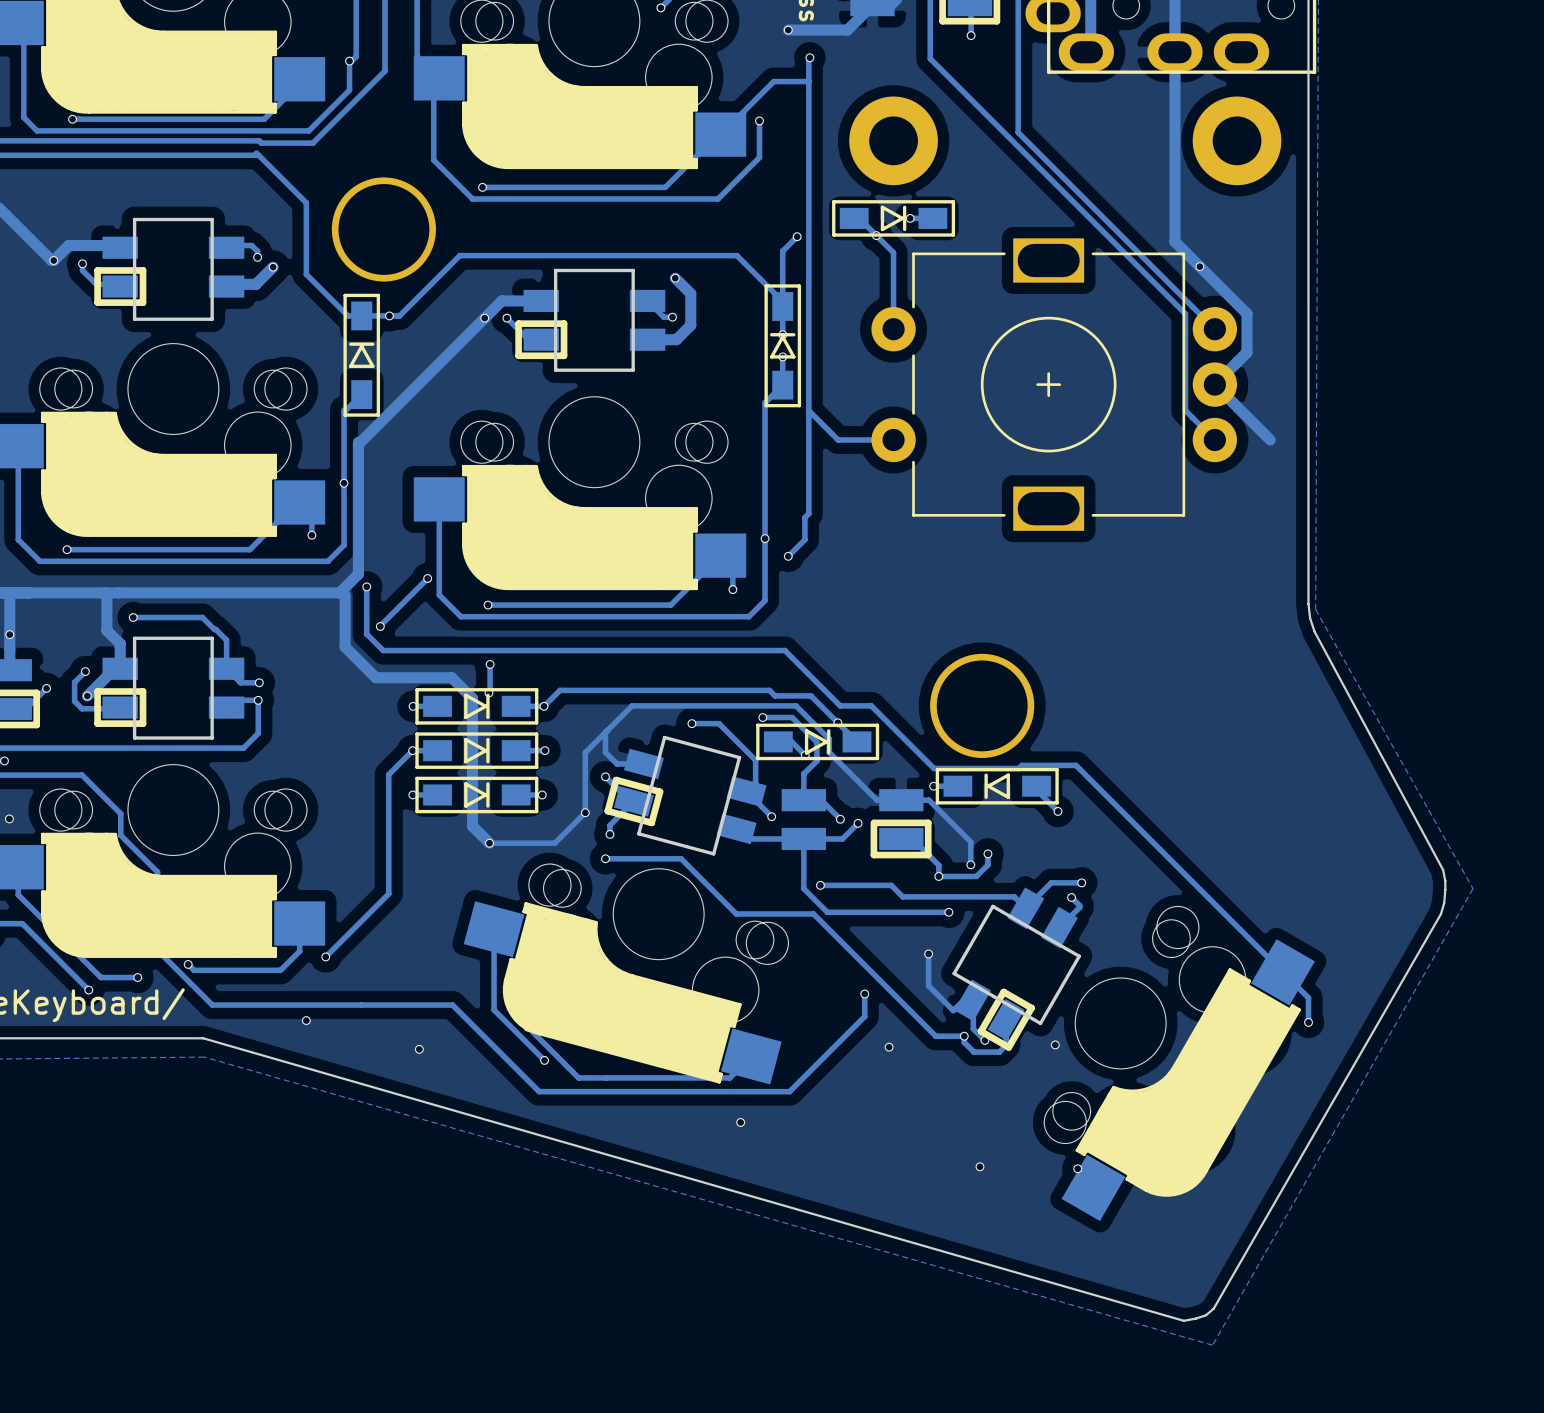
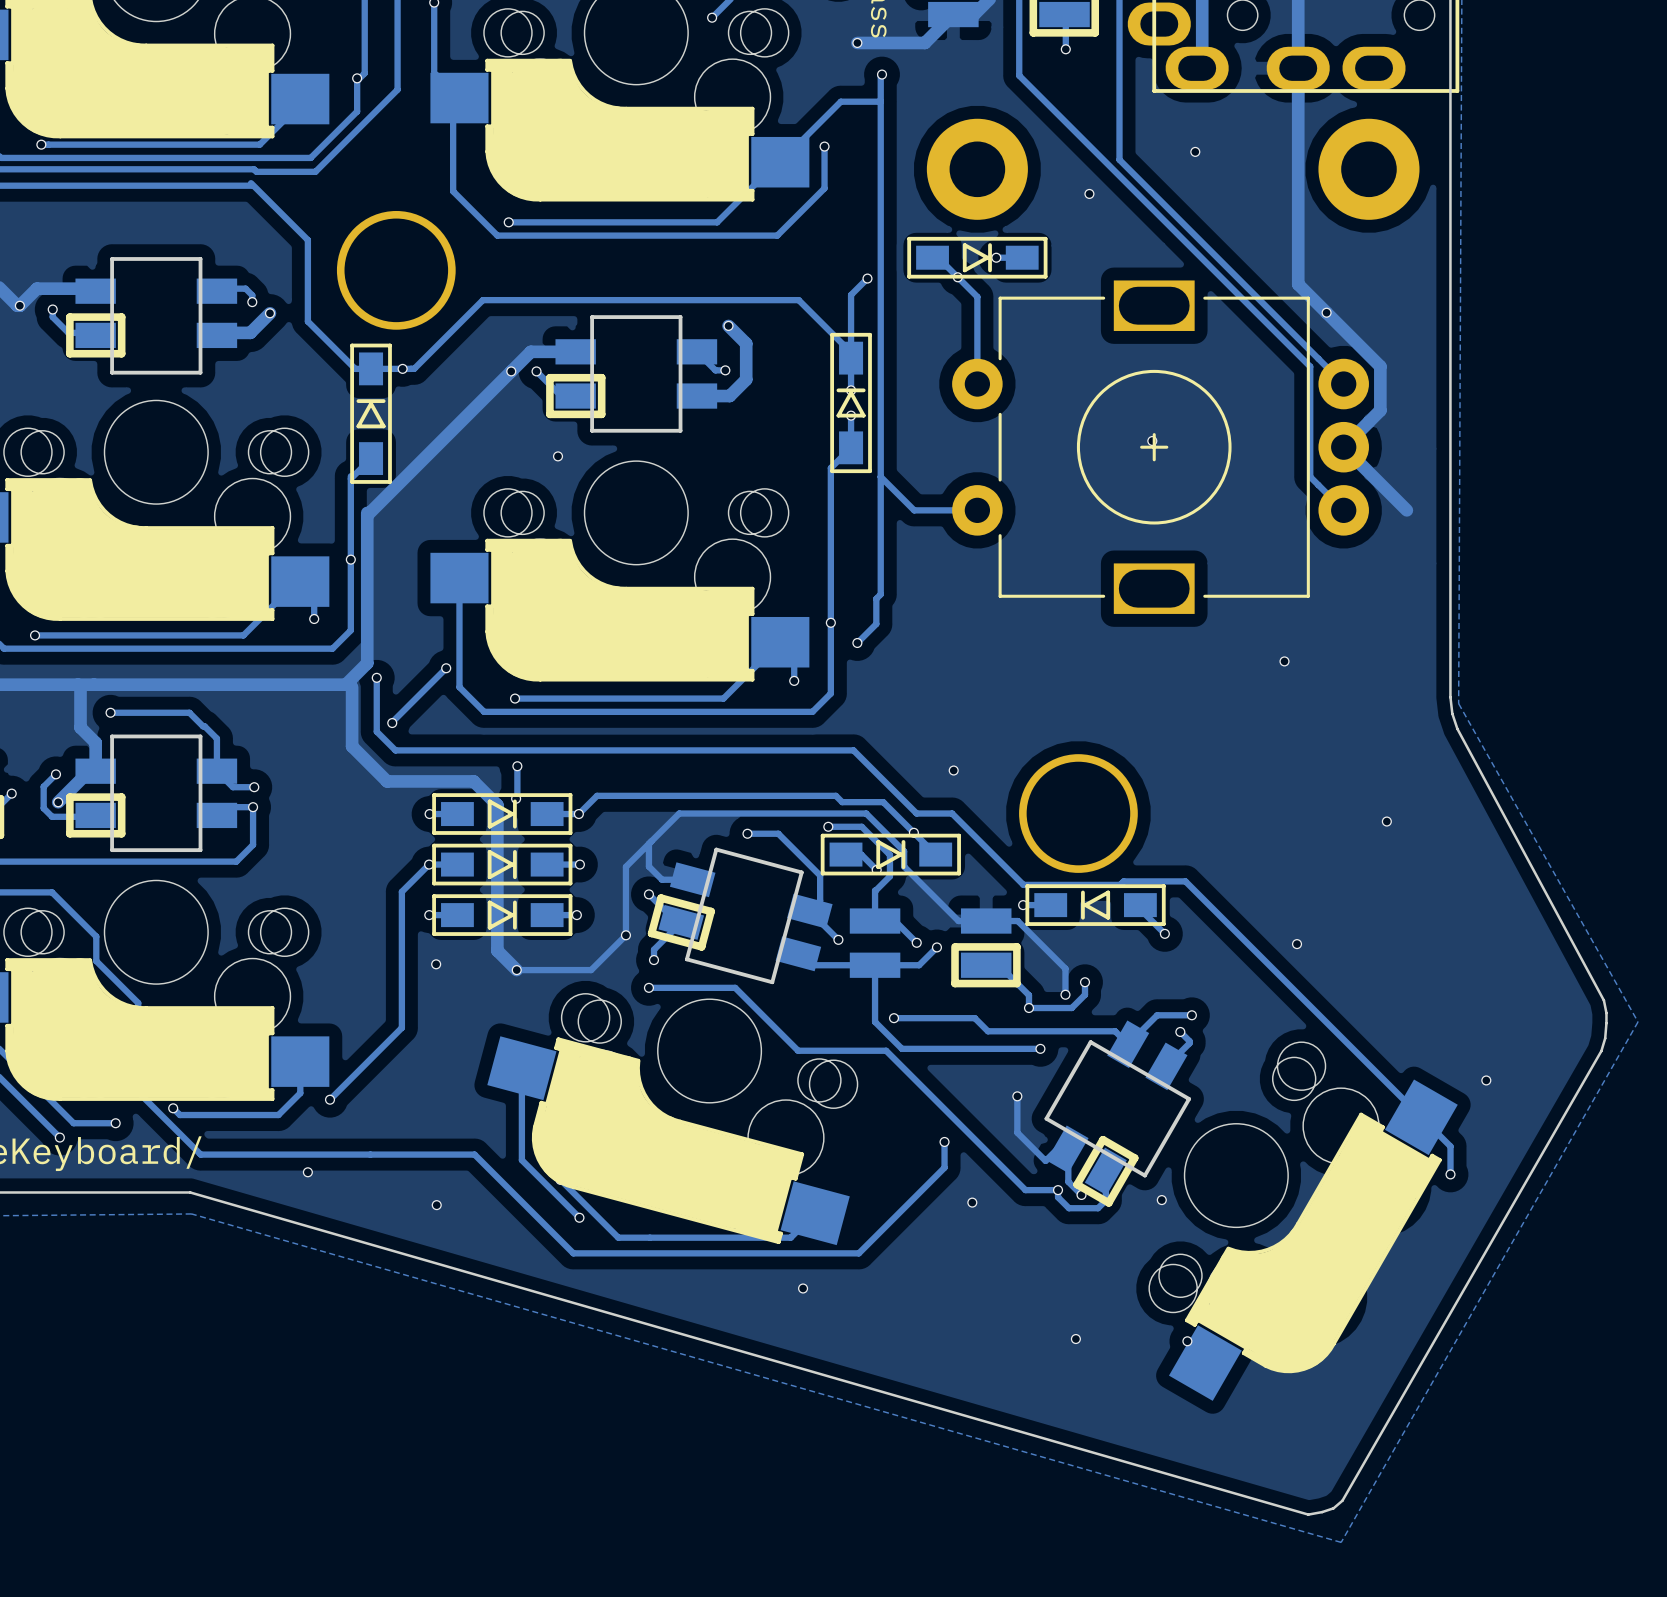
via: none -> (1195, 151)
via: none -> (1089, 193)
via: none -> (1152, 440)
via: none -> (558, 456)
via: none -> (1284, 661)
via: none -> (953, 770)
via: none -> (1386, 821)
via: none -> (1297, 944)
via: none -> (436, 964)
via: none -> (1486, 1080)

